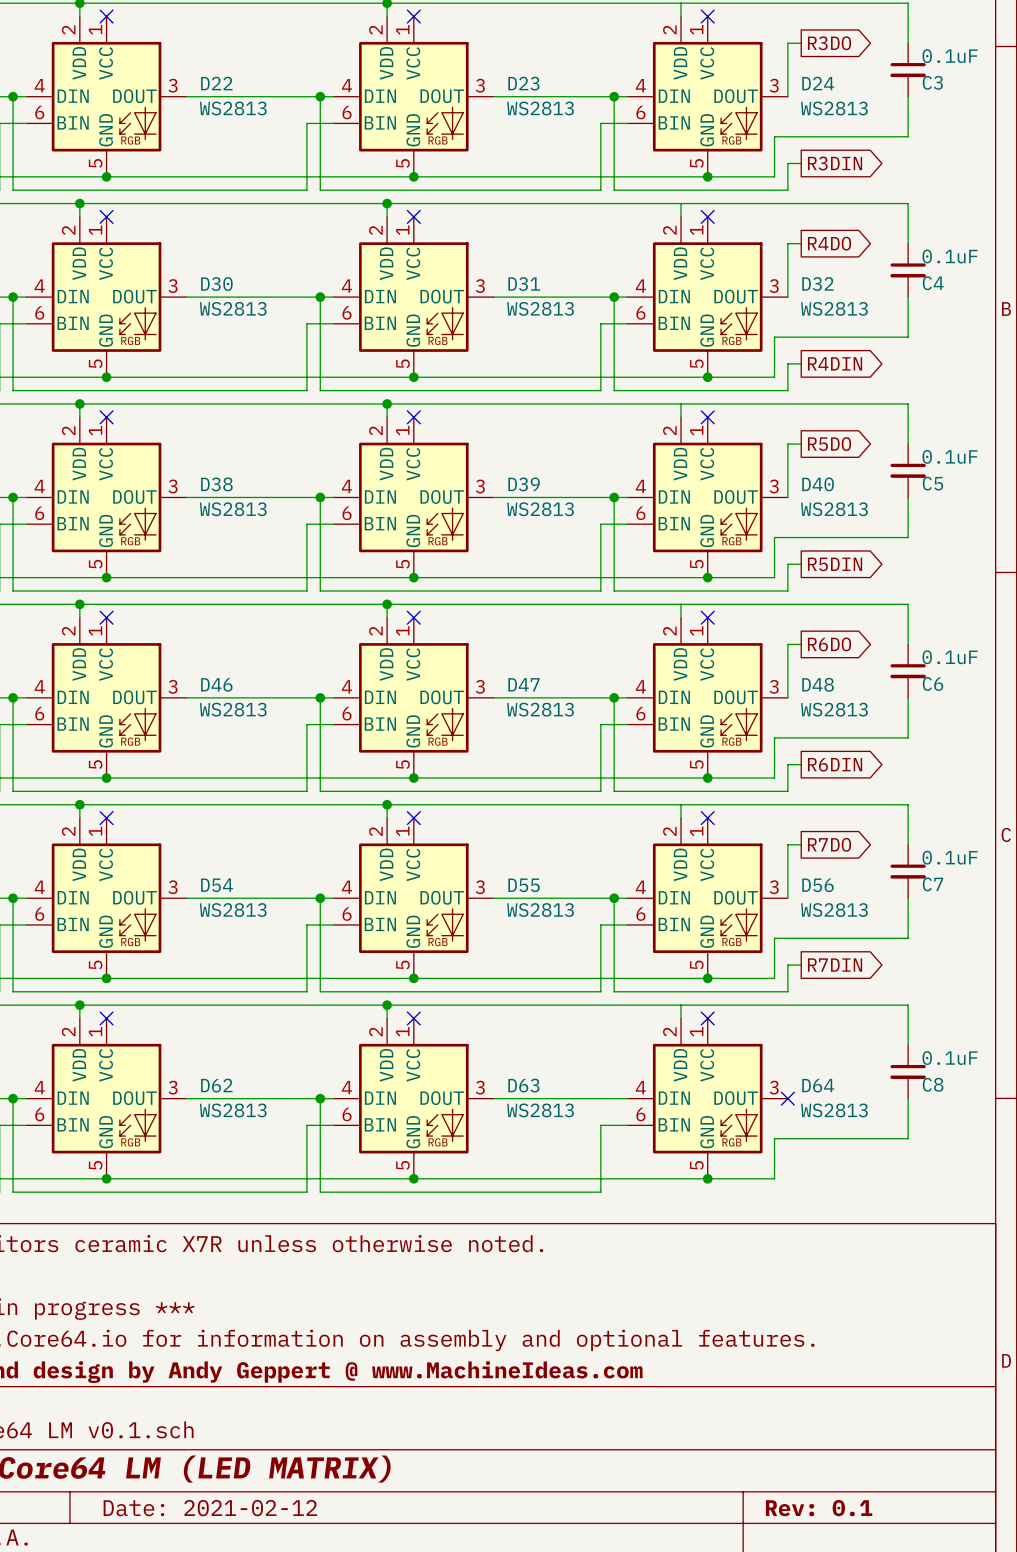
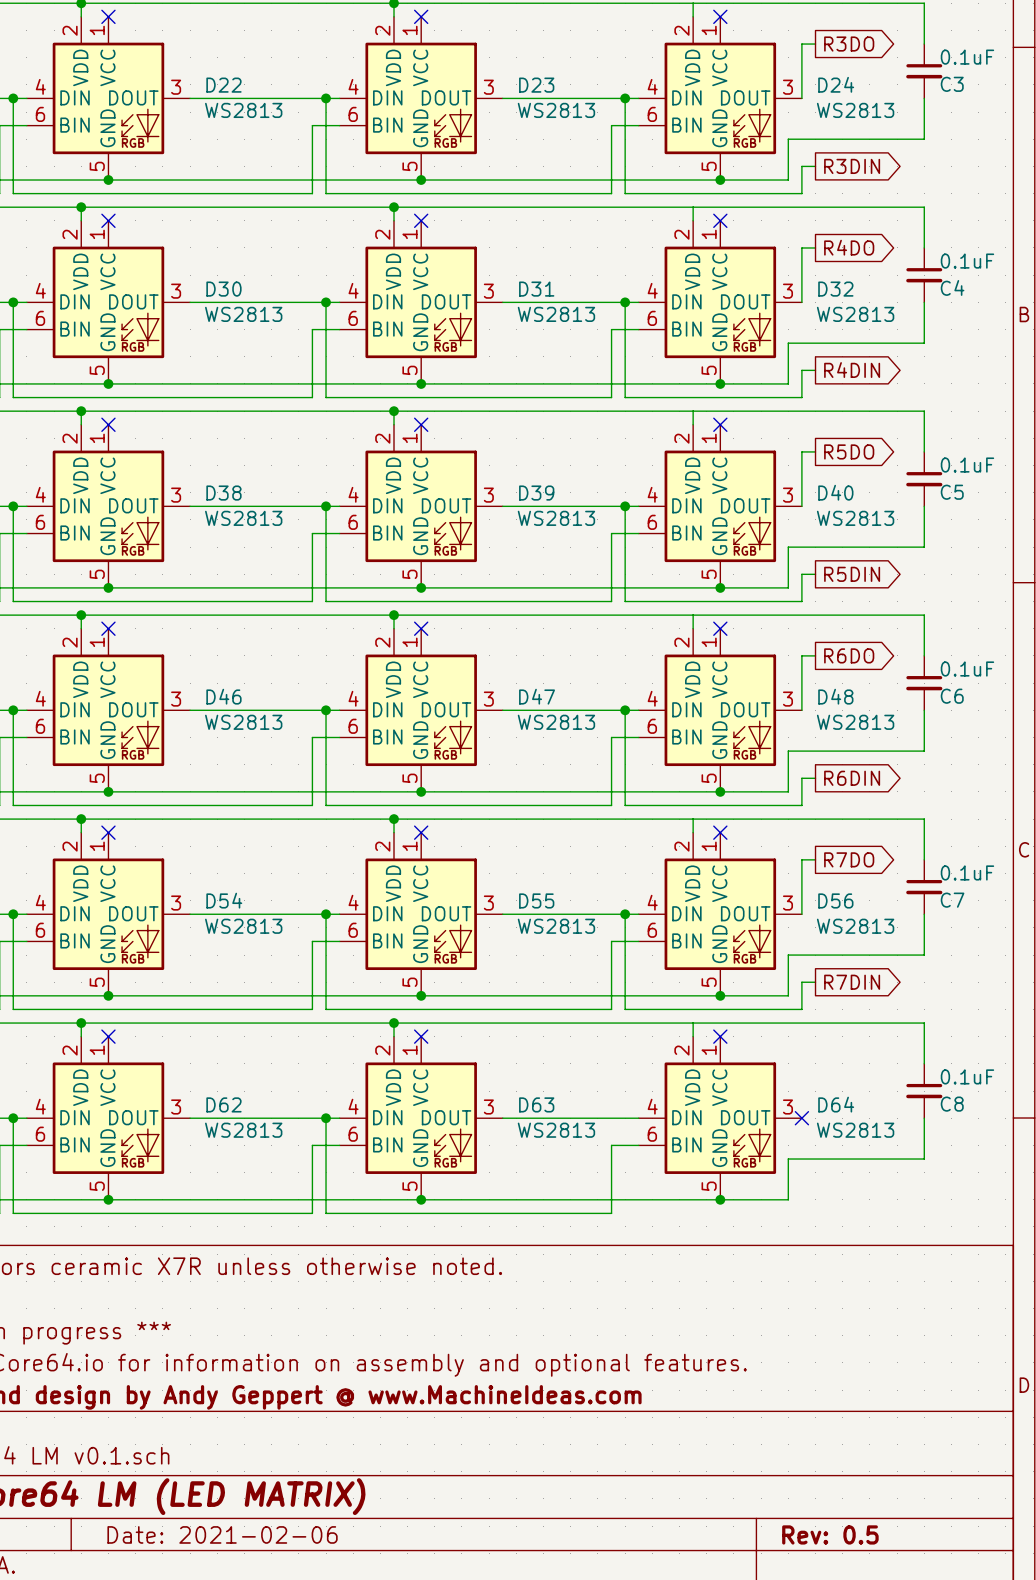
title block: Date: 2021-02-12 (210, 1508) -> Date: 2021-02-06 (222, 1534)
title block: Rev: 0.1 (819, 1508) -> Rev: 0.5 (830, 1534)

